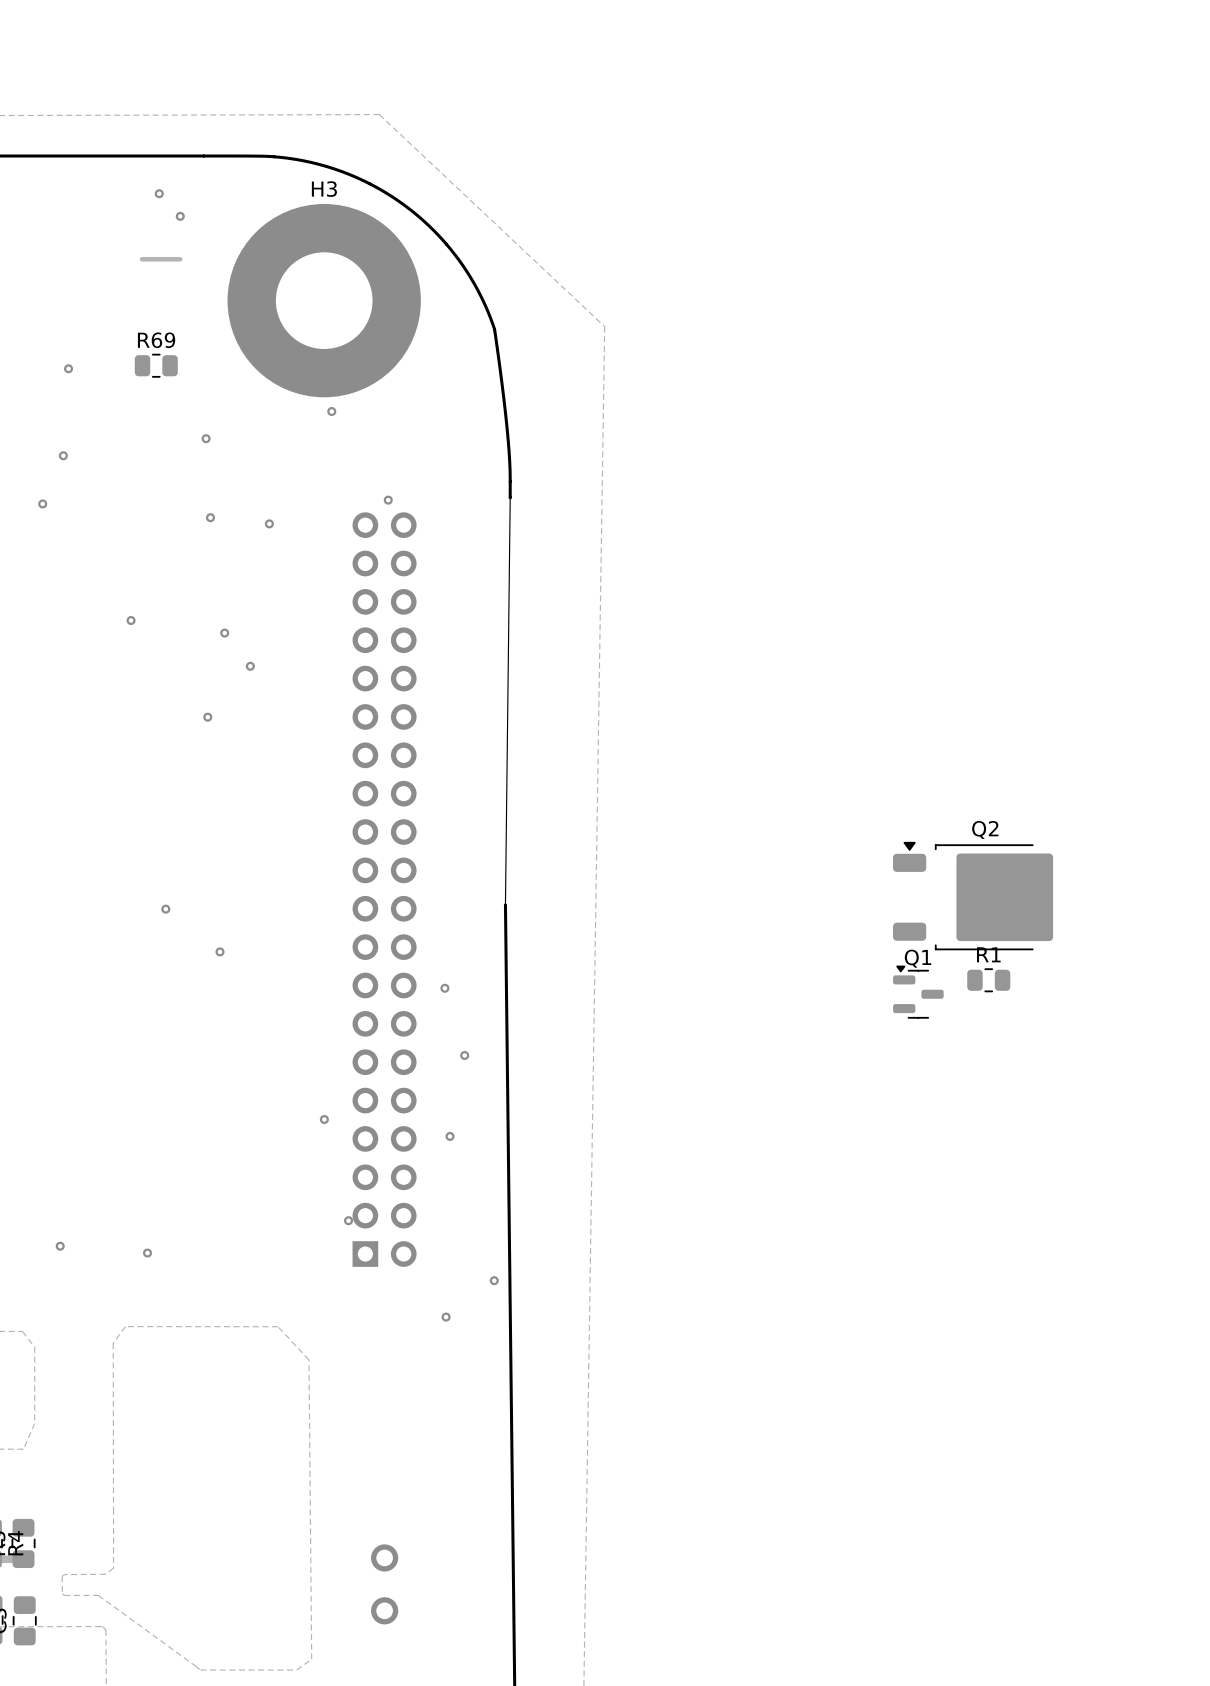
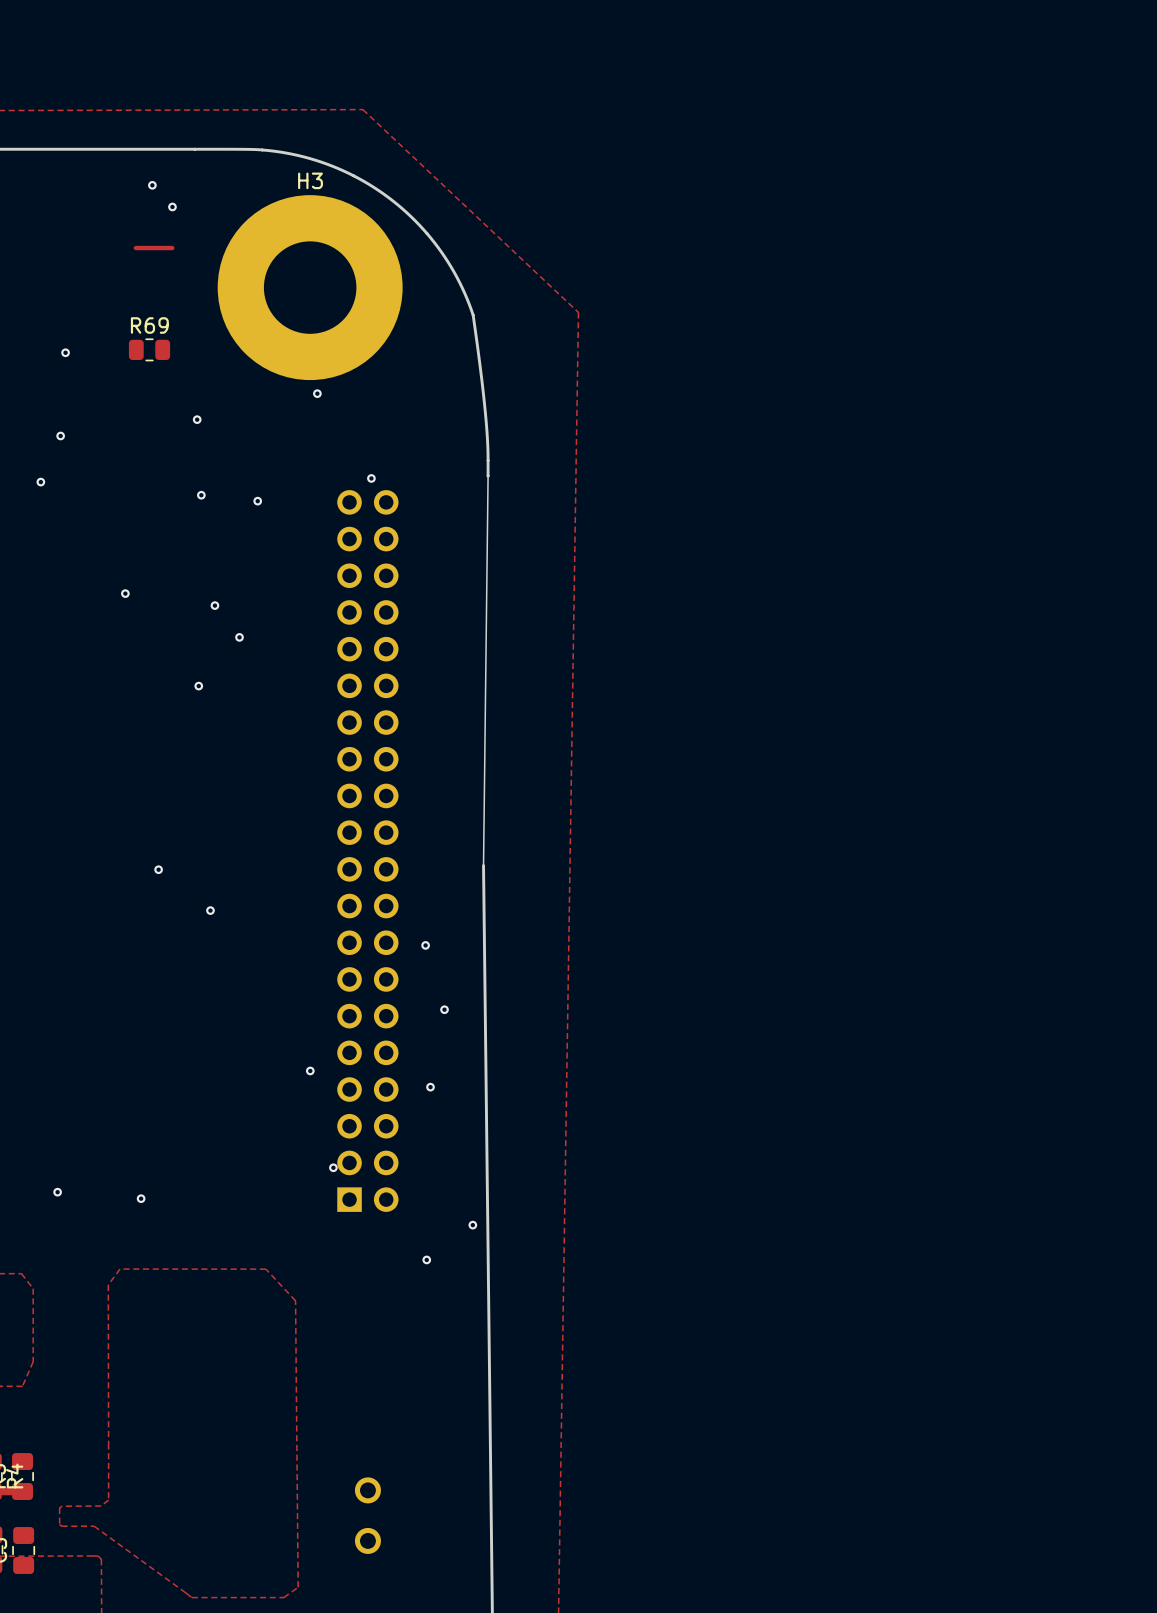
Q2: (973, 896) -> none
R1: (988, 980) -> none
Q1: (918, 992) -> none

